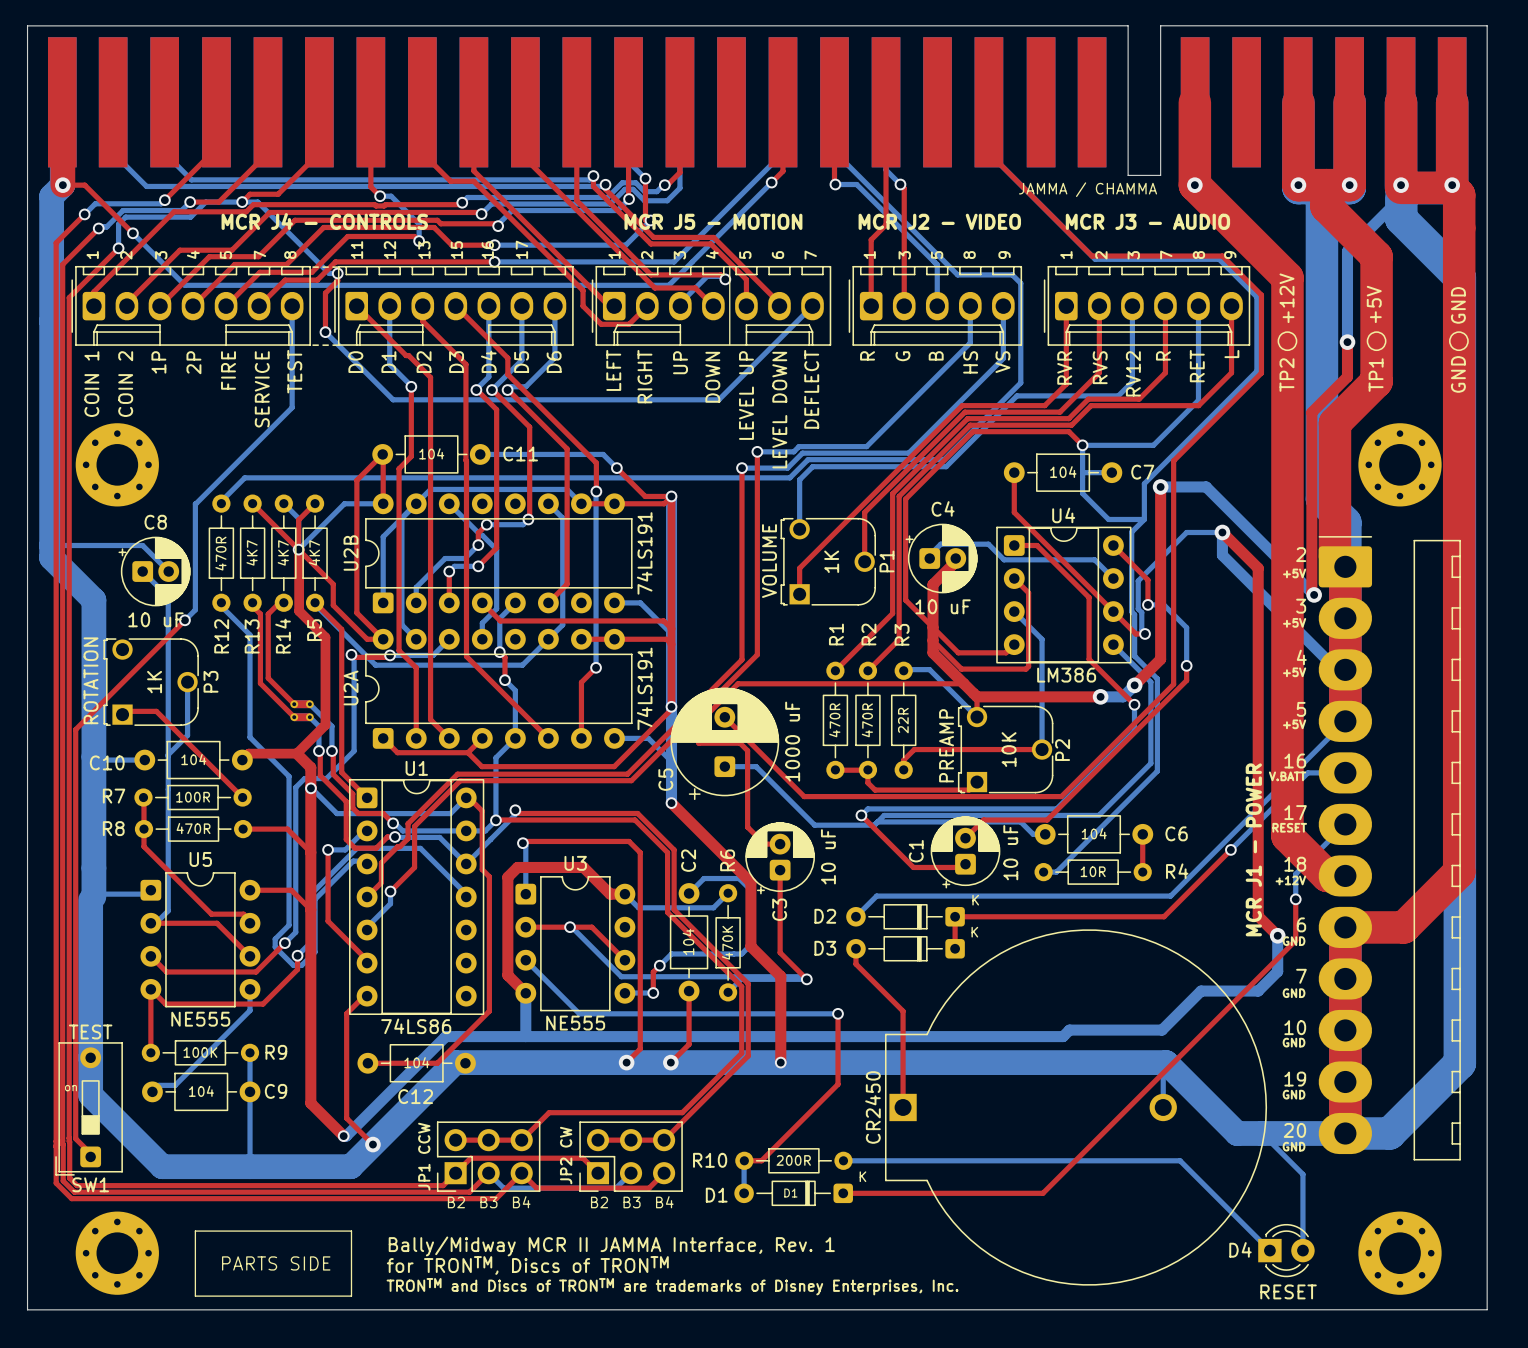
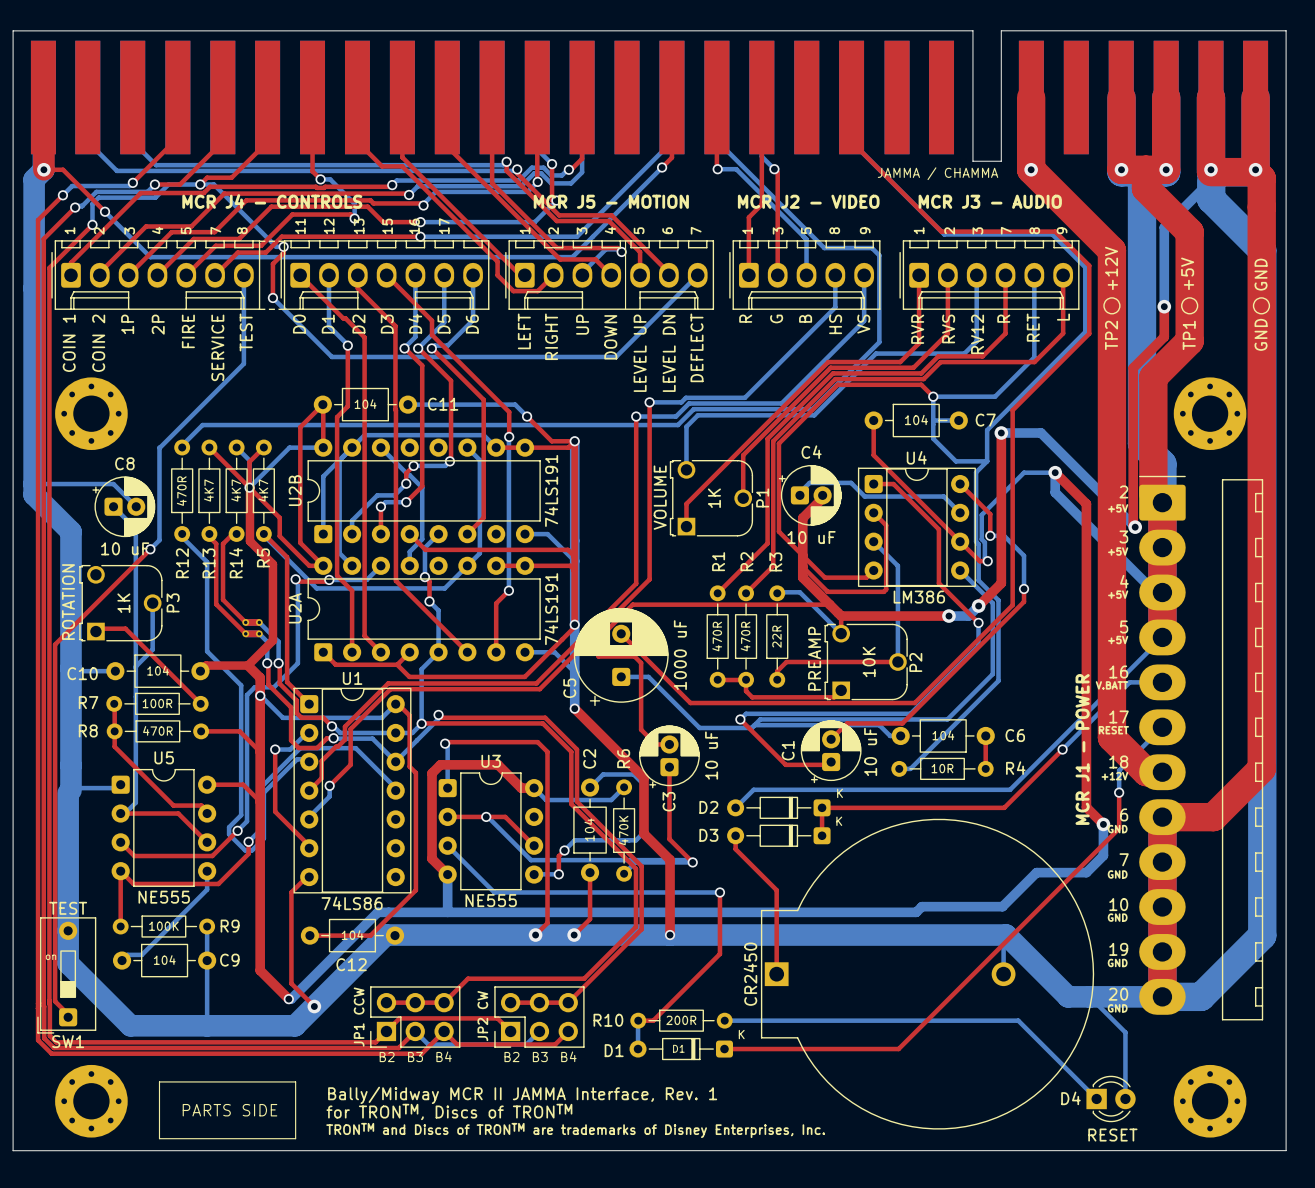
text: LEVEL DOWN (779, 410) -> LEVEL DN (669, 353)

